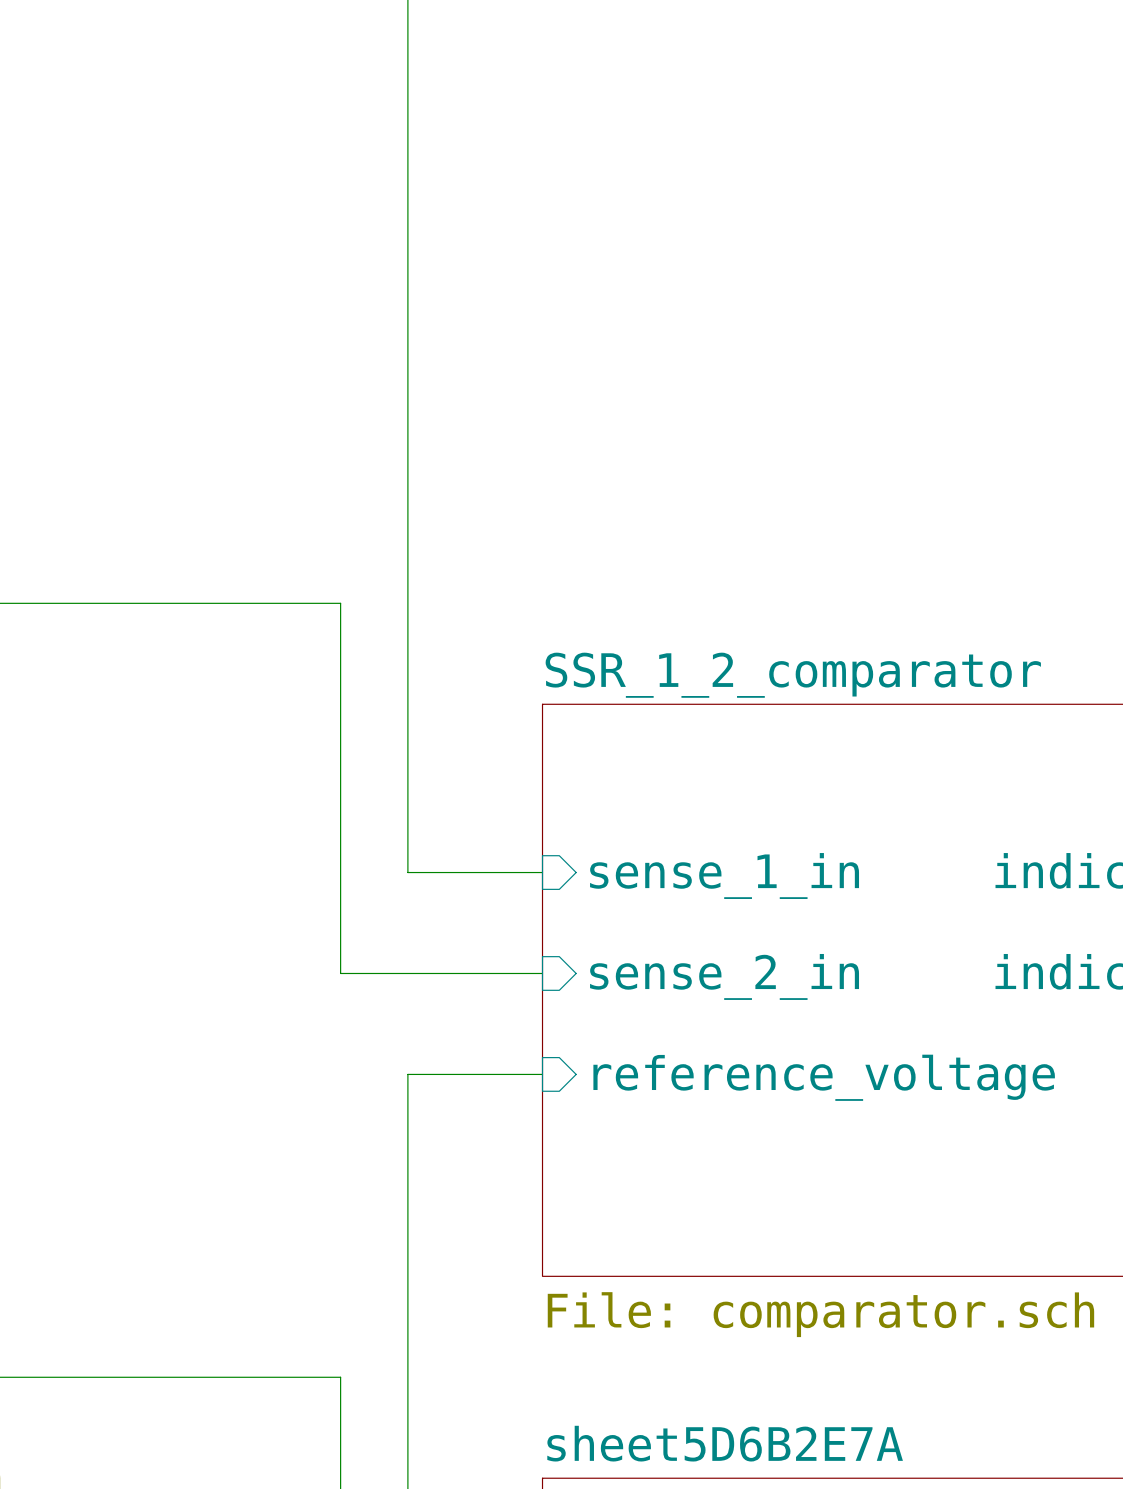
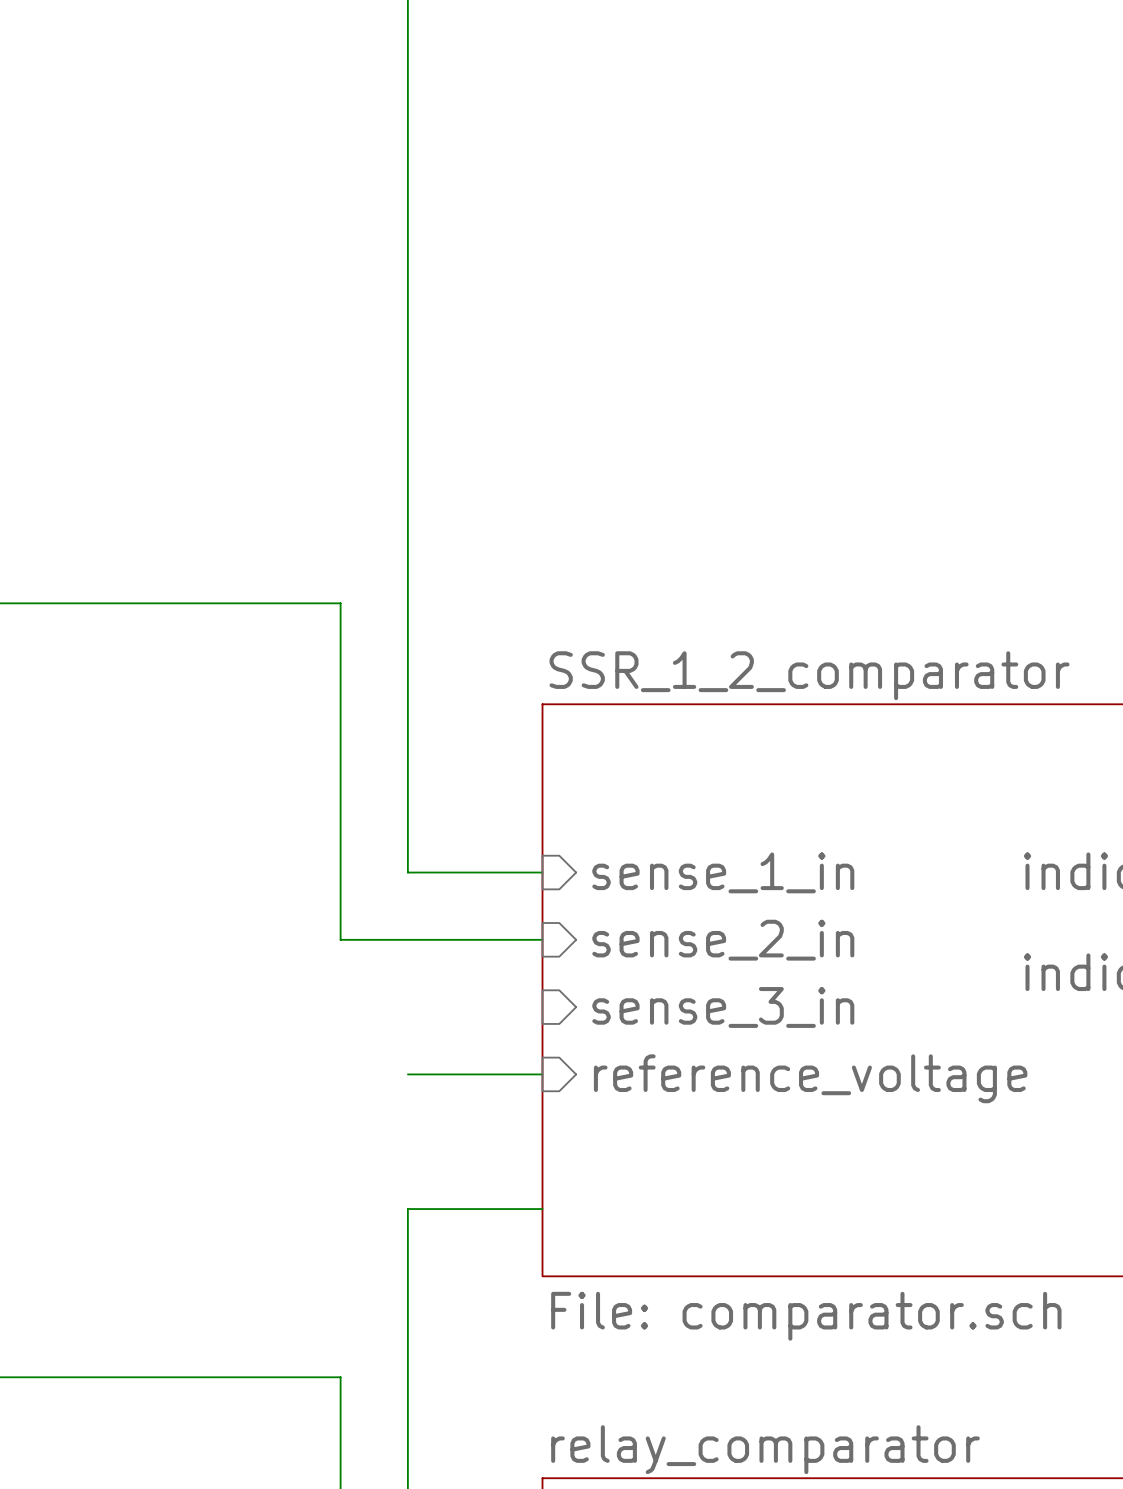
wire: (340, 939) (340, 973) (542, 973) -> (340, 939) (542, 939)
sheet pin position: sense_2_in (724, 976) -> sense_2_in (723, 940)
sheet pin: none -> sense_3_in (723, 1007)
wire: (407, 1074) (407, 1209) -> (542, 1209) (407, 1209)
sheet sheet5D6B2E7A name: sheet5D6B2E7A (725, 1443) -> relay_comparator (765, 1449)

